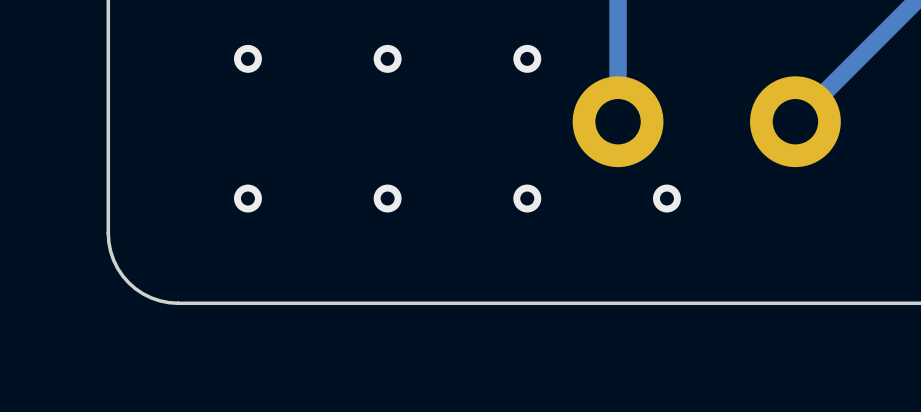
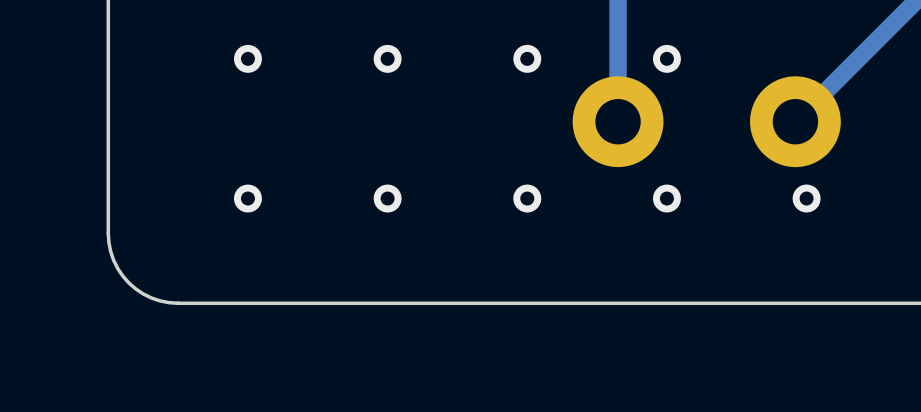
via: none -> (666, 58)
via: none -> (806, 198)

